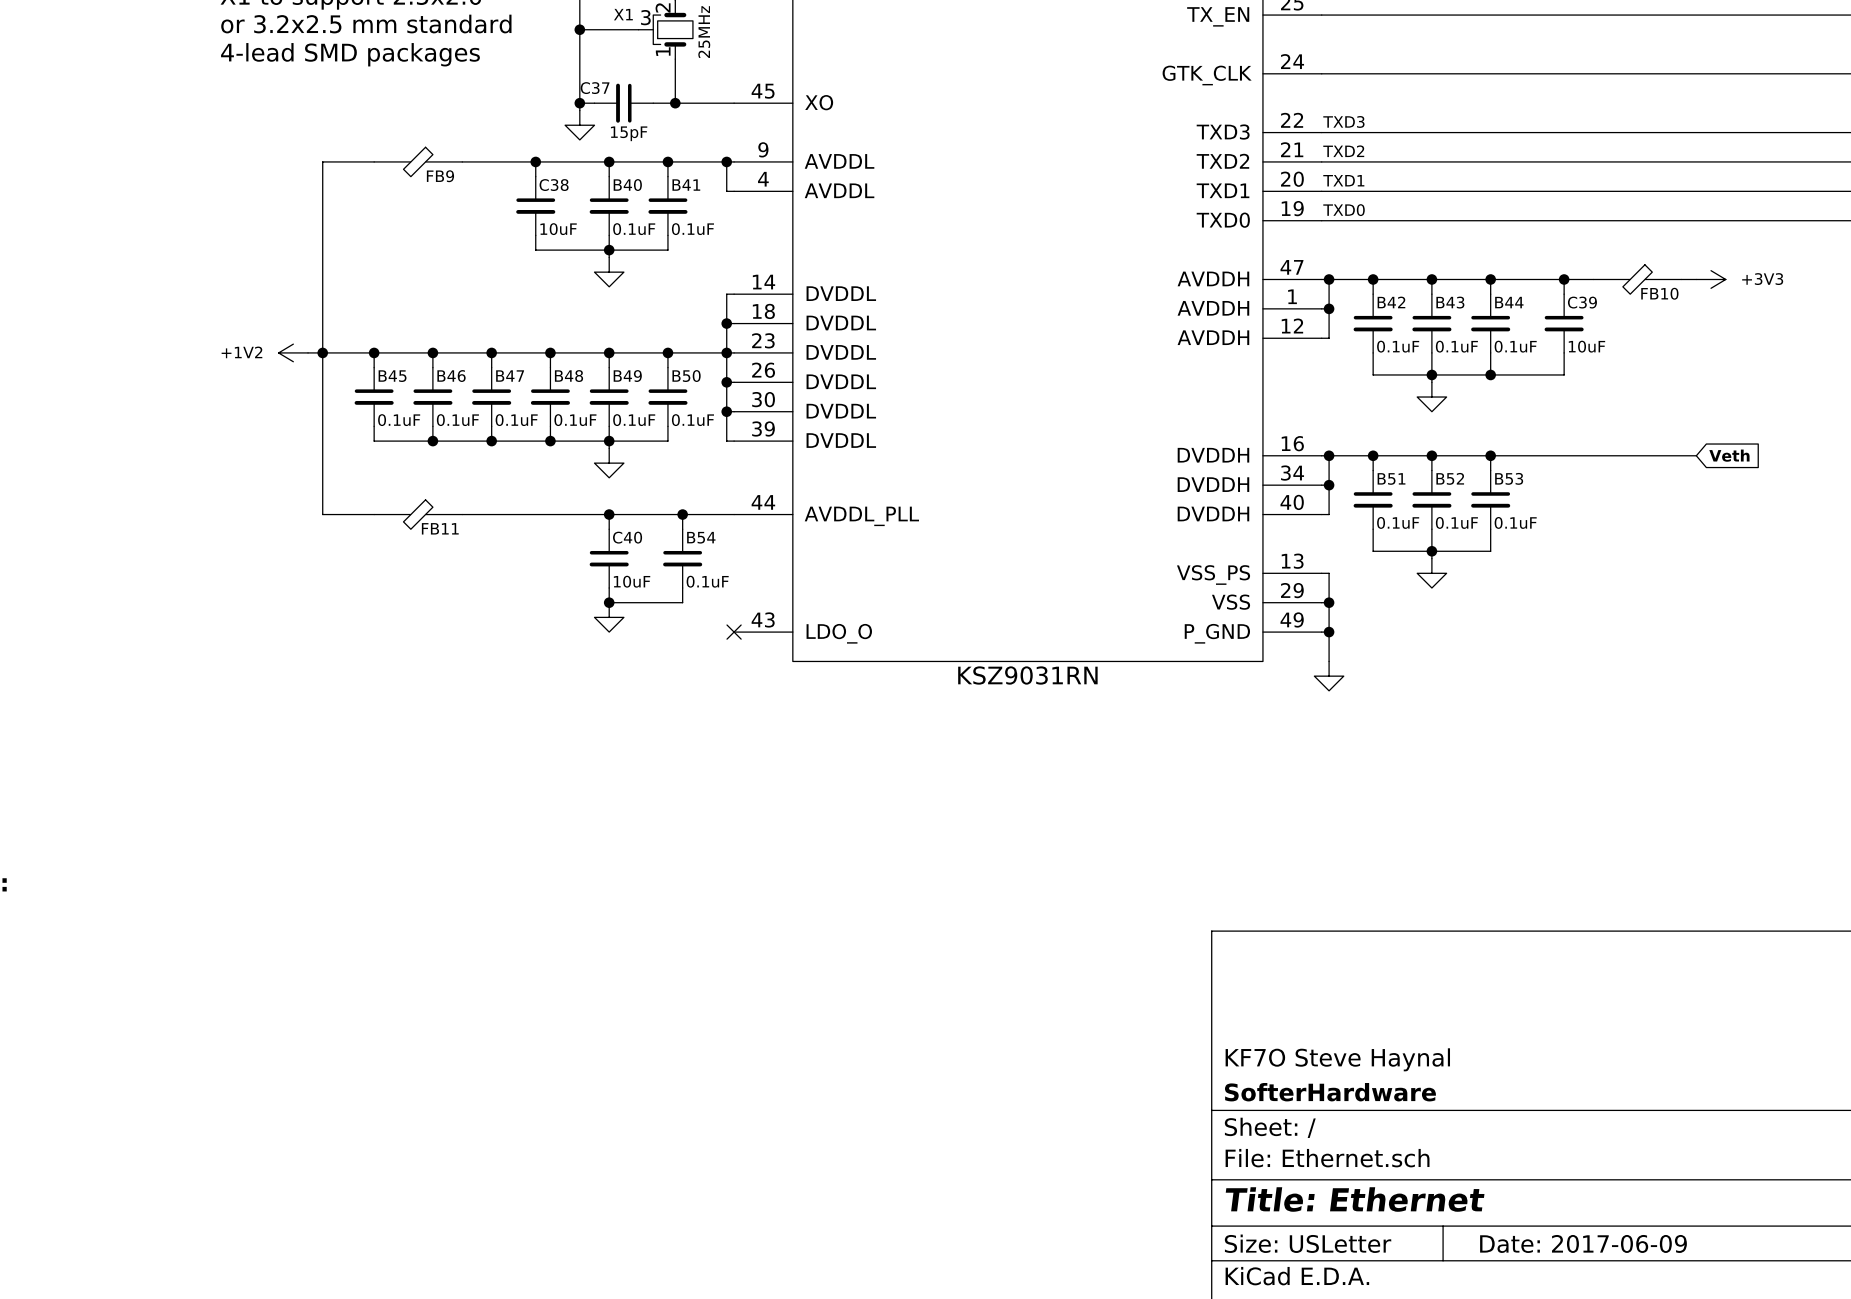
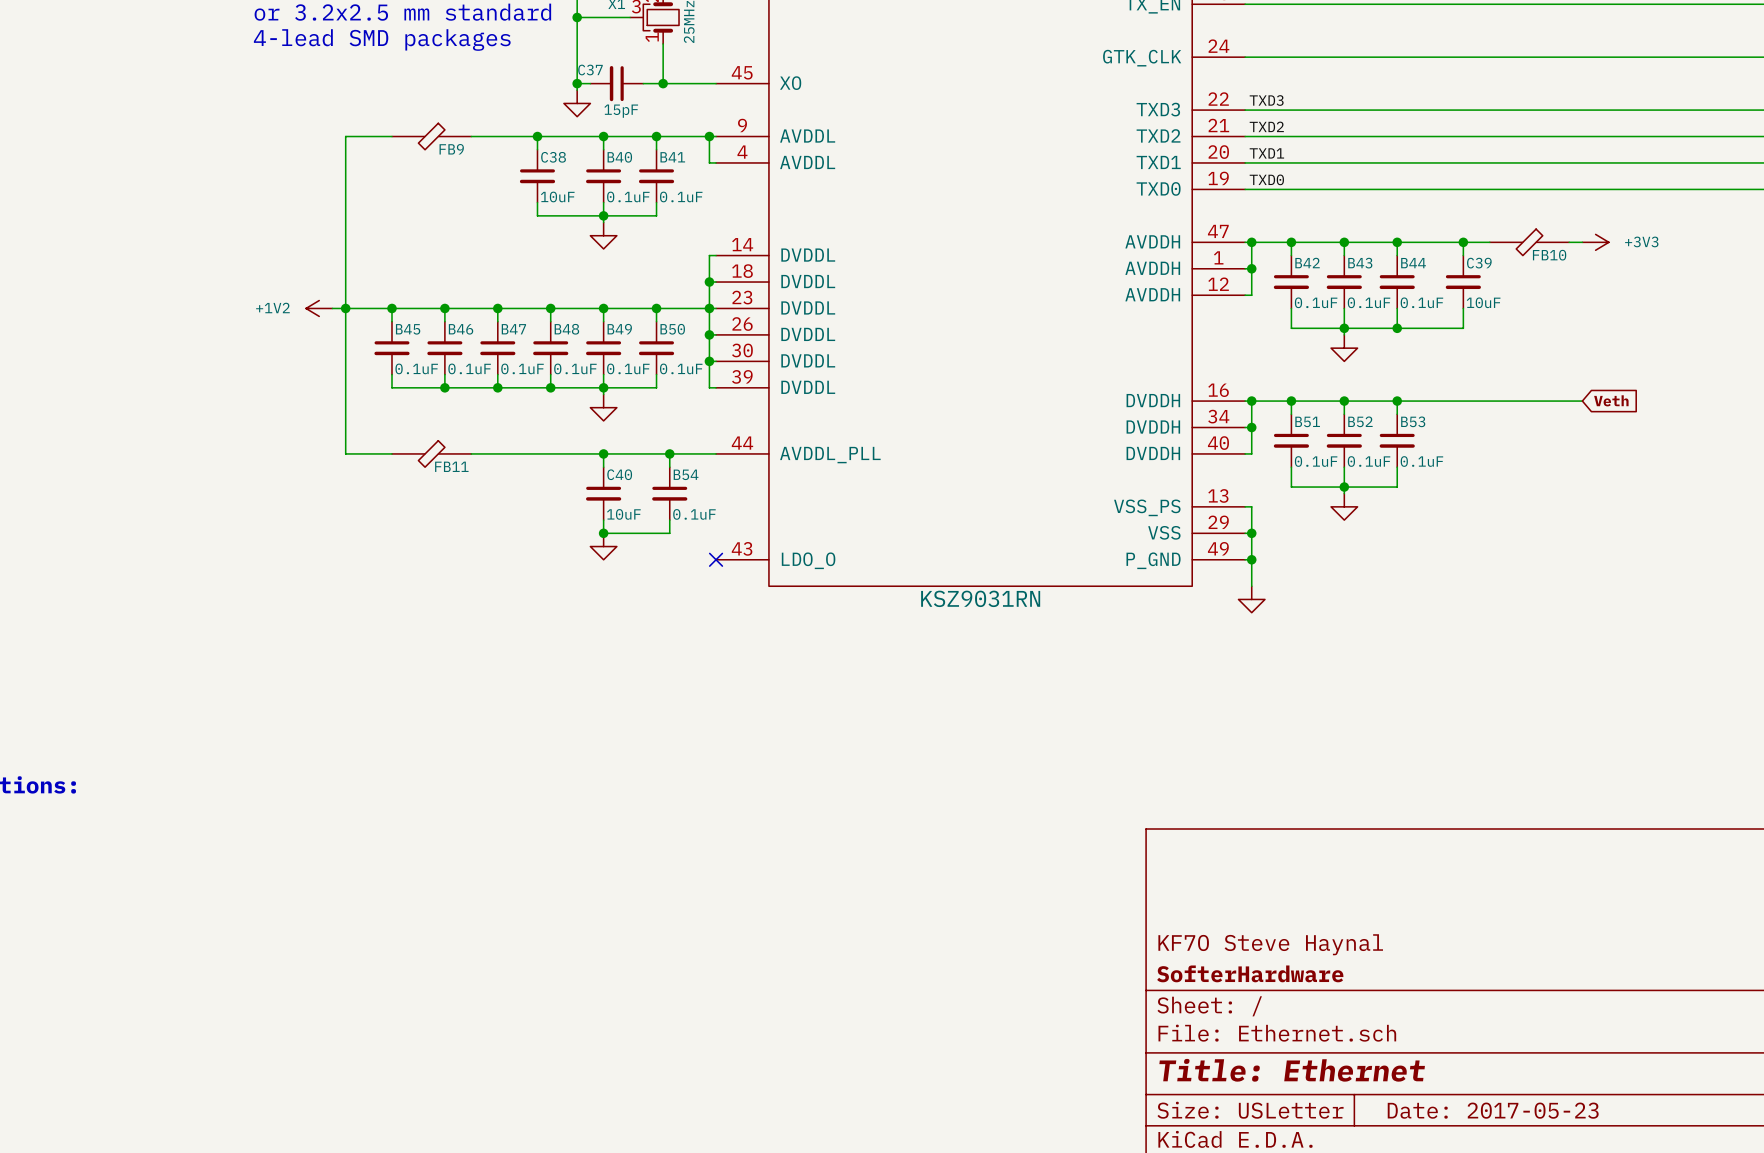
title block: Date: 2017-06-09 (1583, 1243) -> Date: 2017-05-23 (1493, 1110)

